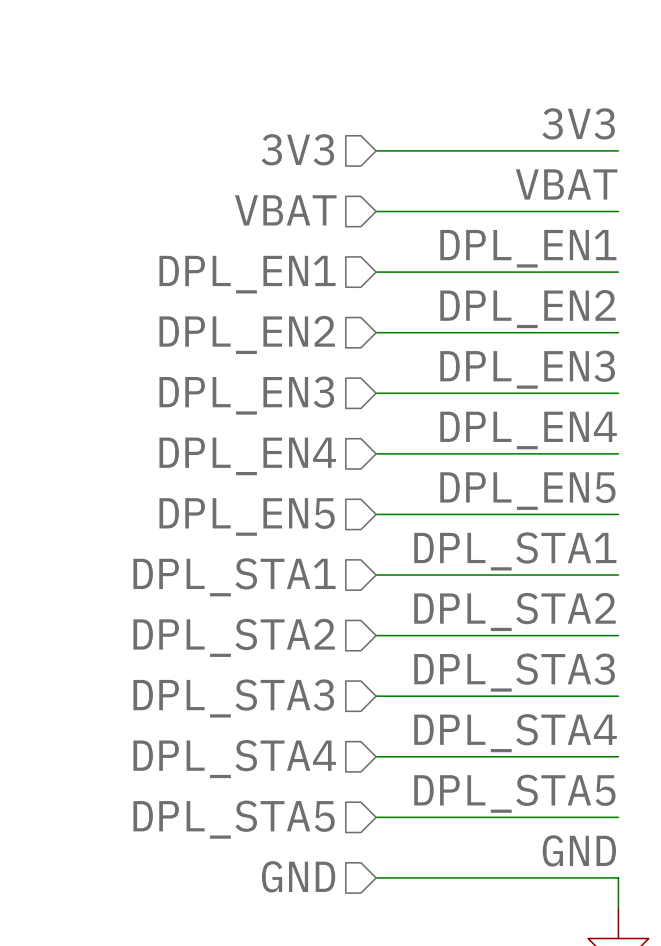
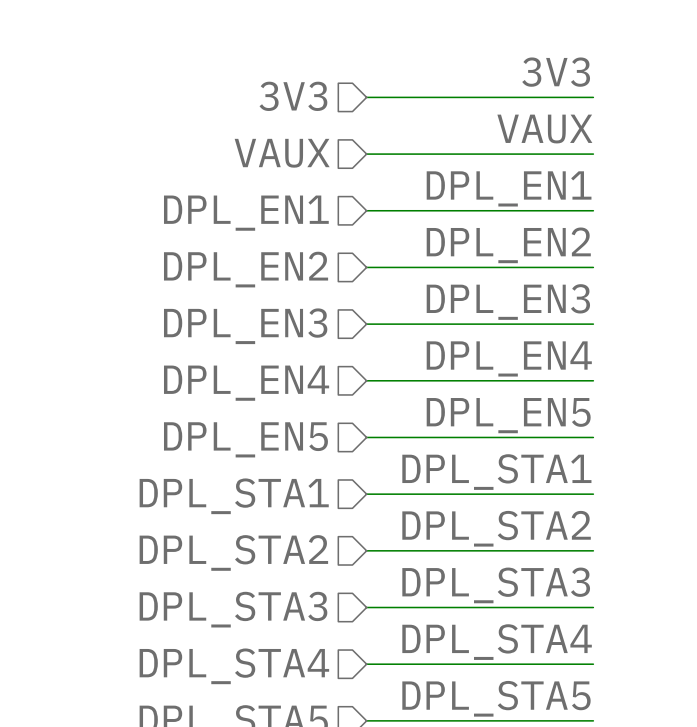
label: VBAT (566, 184) -> VAUX (544, 129)
hierarchical label: VBAT (285, 210) -> VAUX (282, 153)

